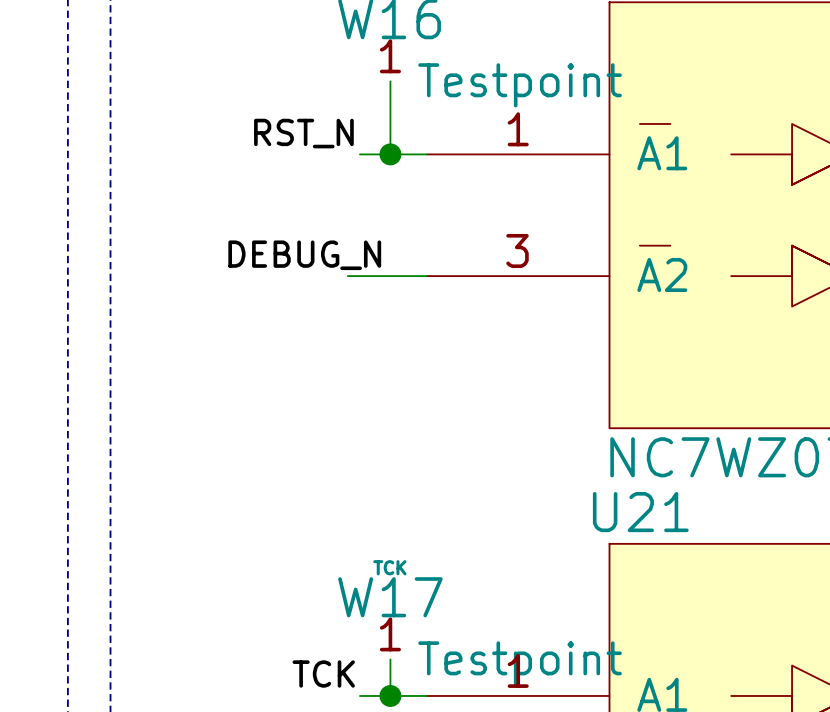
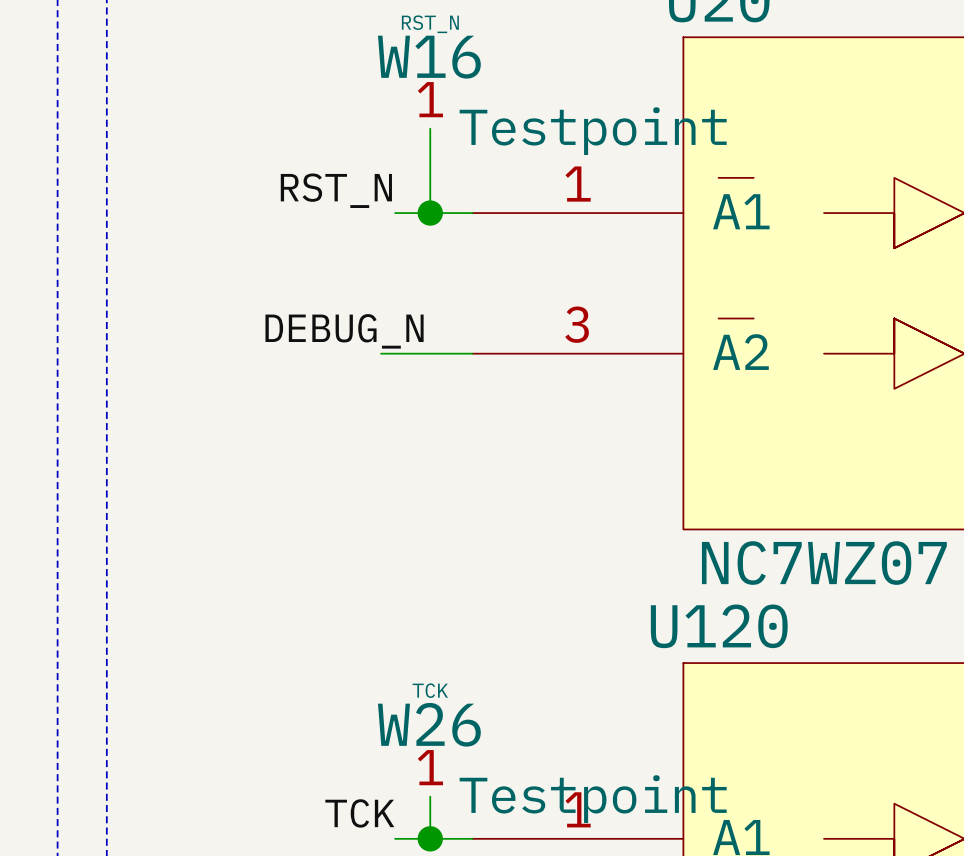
U21 name: U21 (640, 512) -> U120 (719, 626)
W17 name: W17 (390, 597) -> W26 (429, 724)

